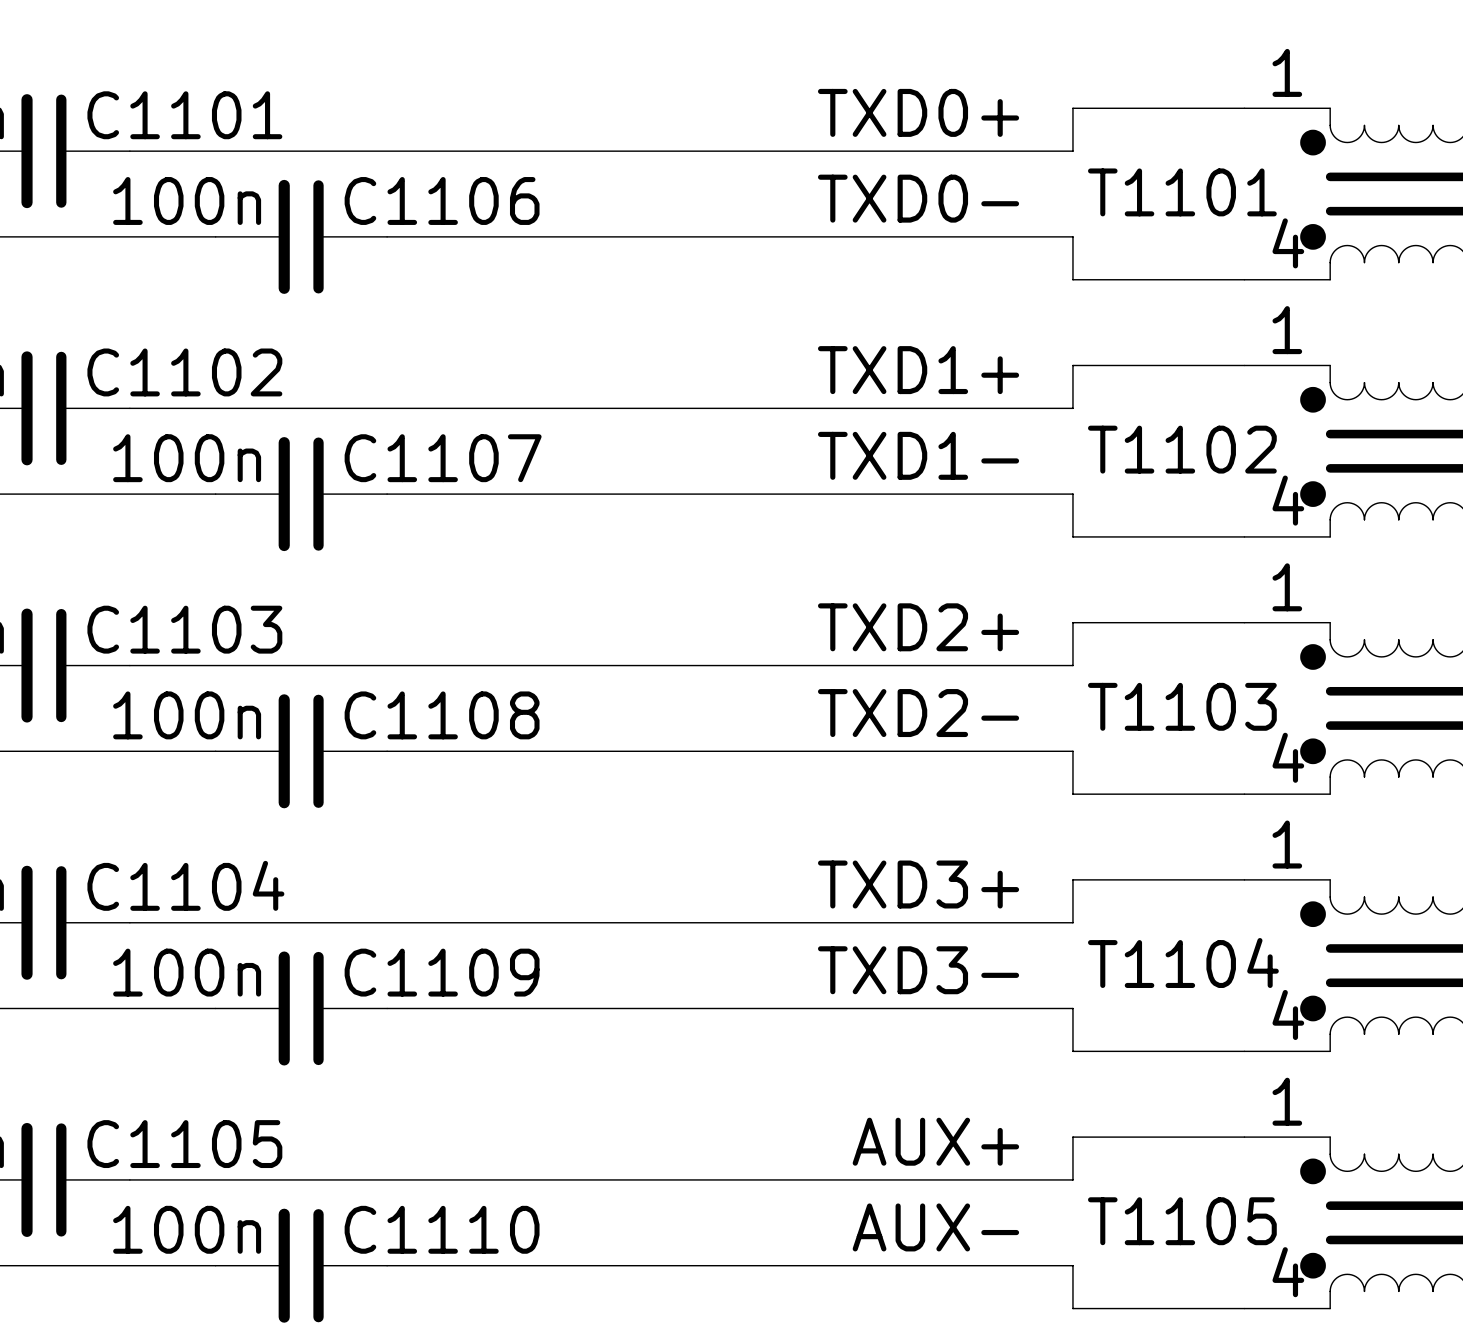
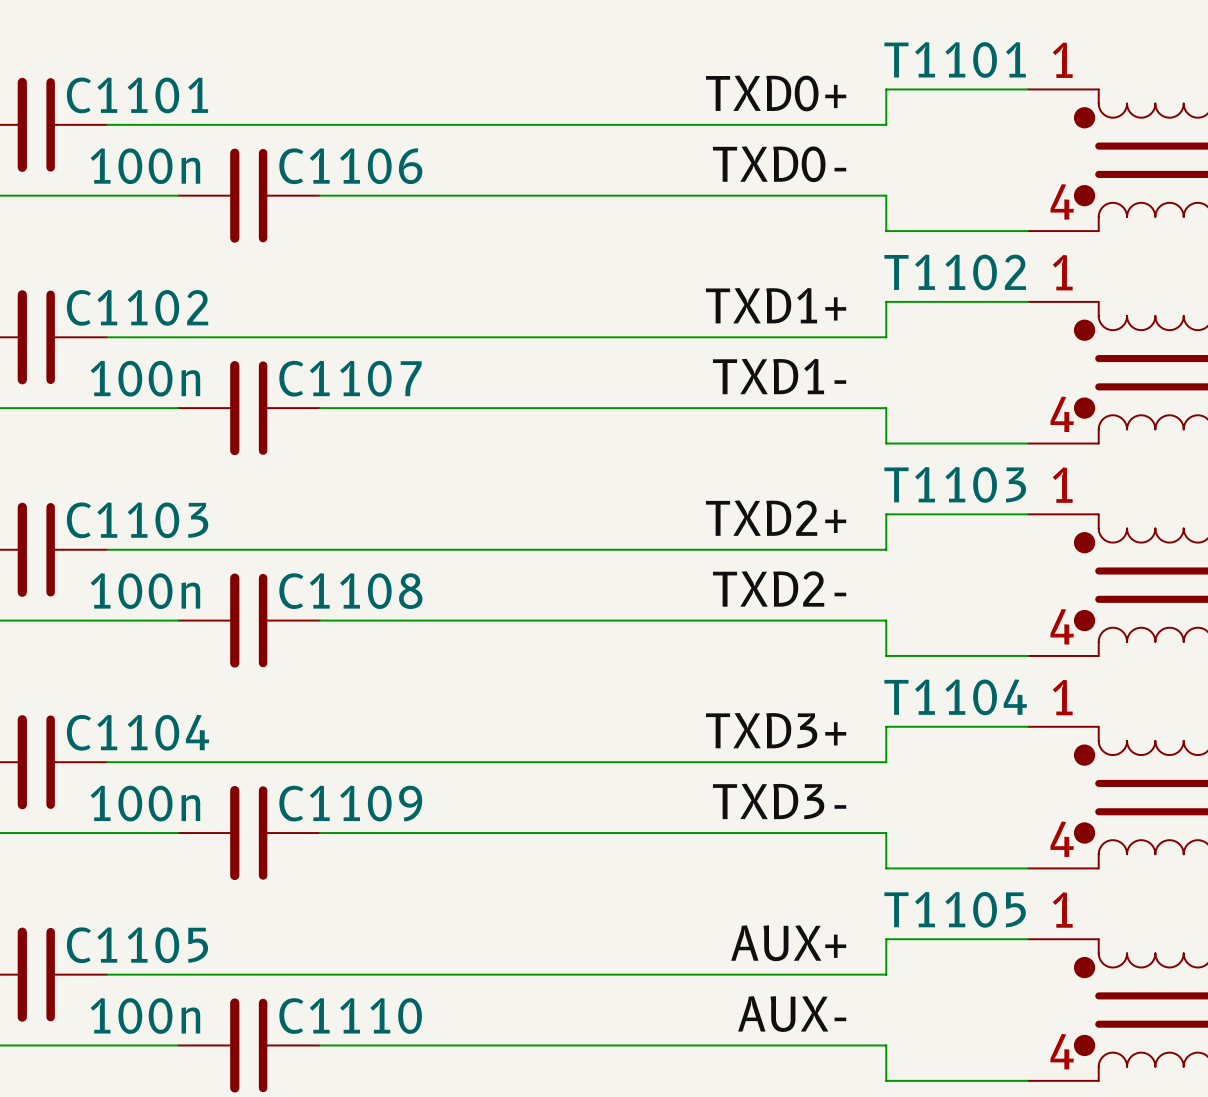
T1101 name position: T1101 (1182, 192) -> T1101 (955, 59)
T1102 name position: T1102 (1182, 449) -> T1102 (955, 272)
T1103 name position: T1103 (1182, 706) -> T1103 (955, 484)
T1104 name position: T1104 (1183, 963) -> T1104 (955, 697)
T1105 name position: T1105 (1182, 1221) -> T1105 (955, 909)

